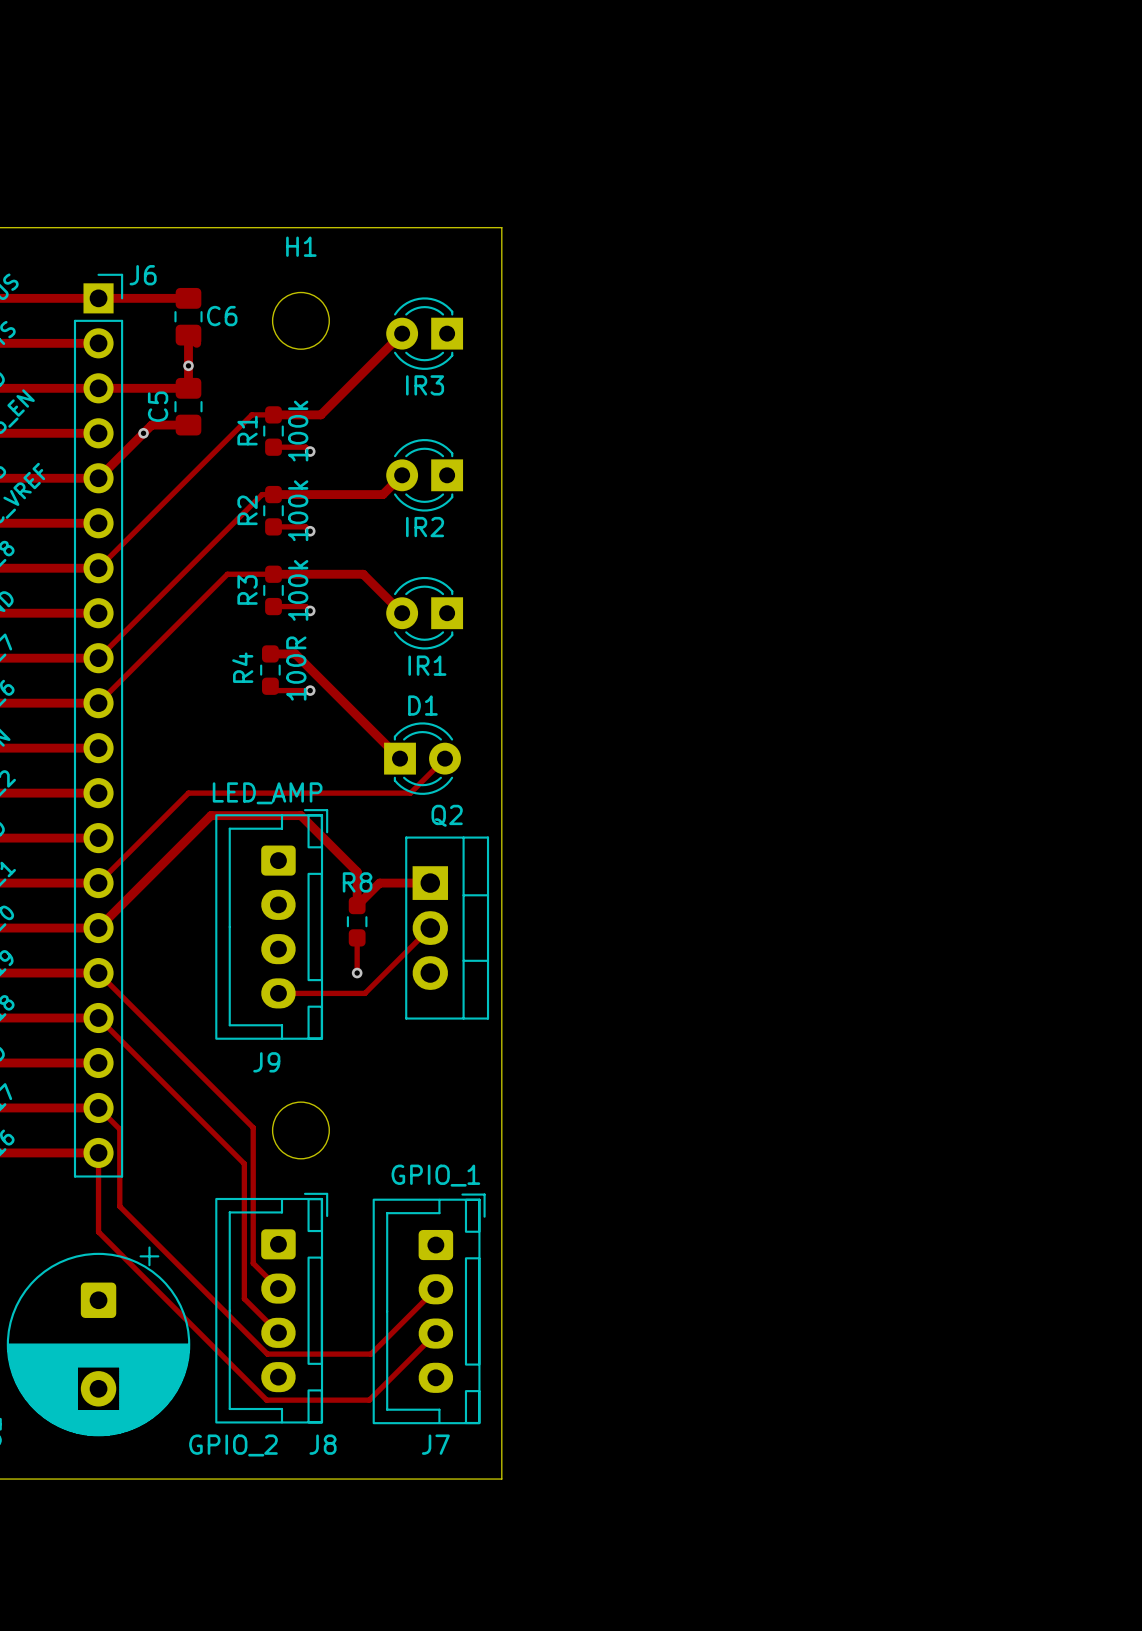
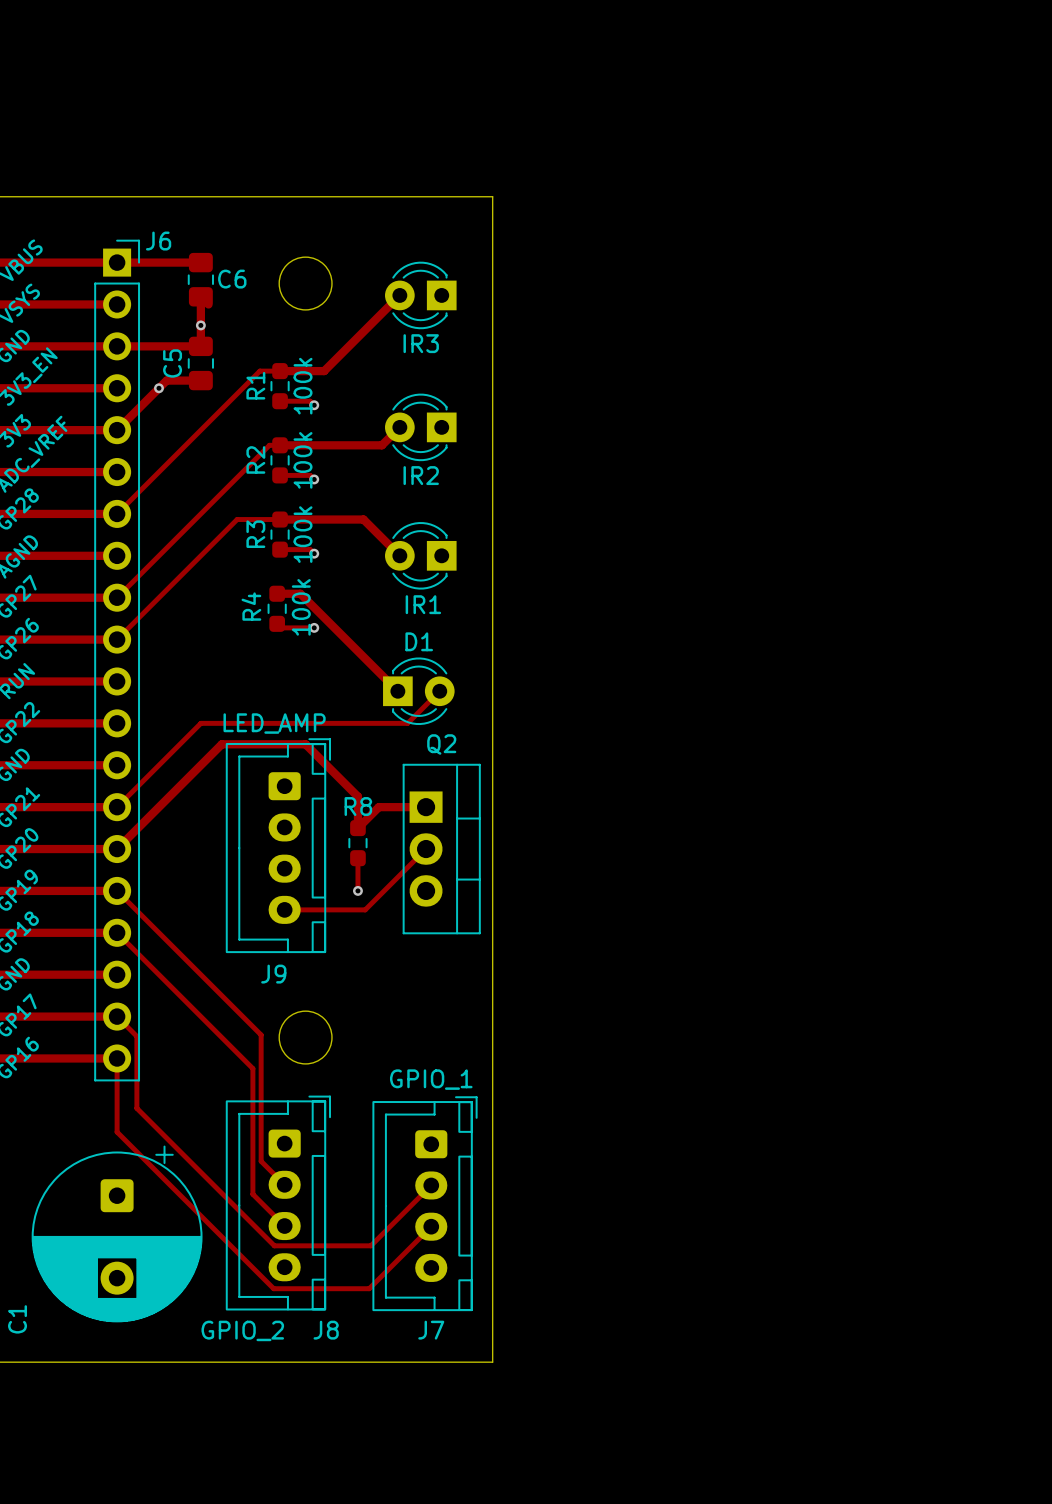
H1 name: H1 (301, 246) -> none
R4 value: 100R (296, 668) -> 100k (301, 607)

